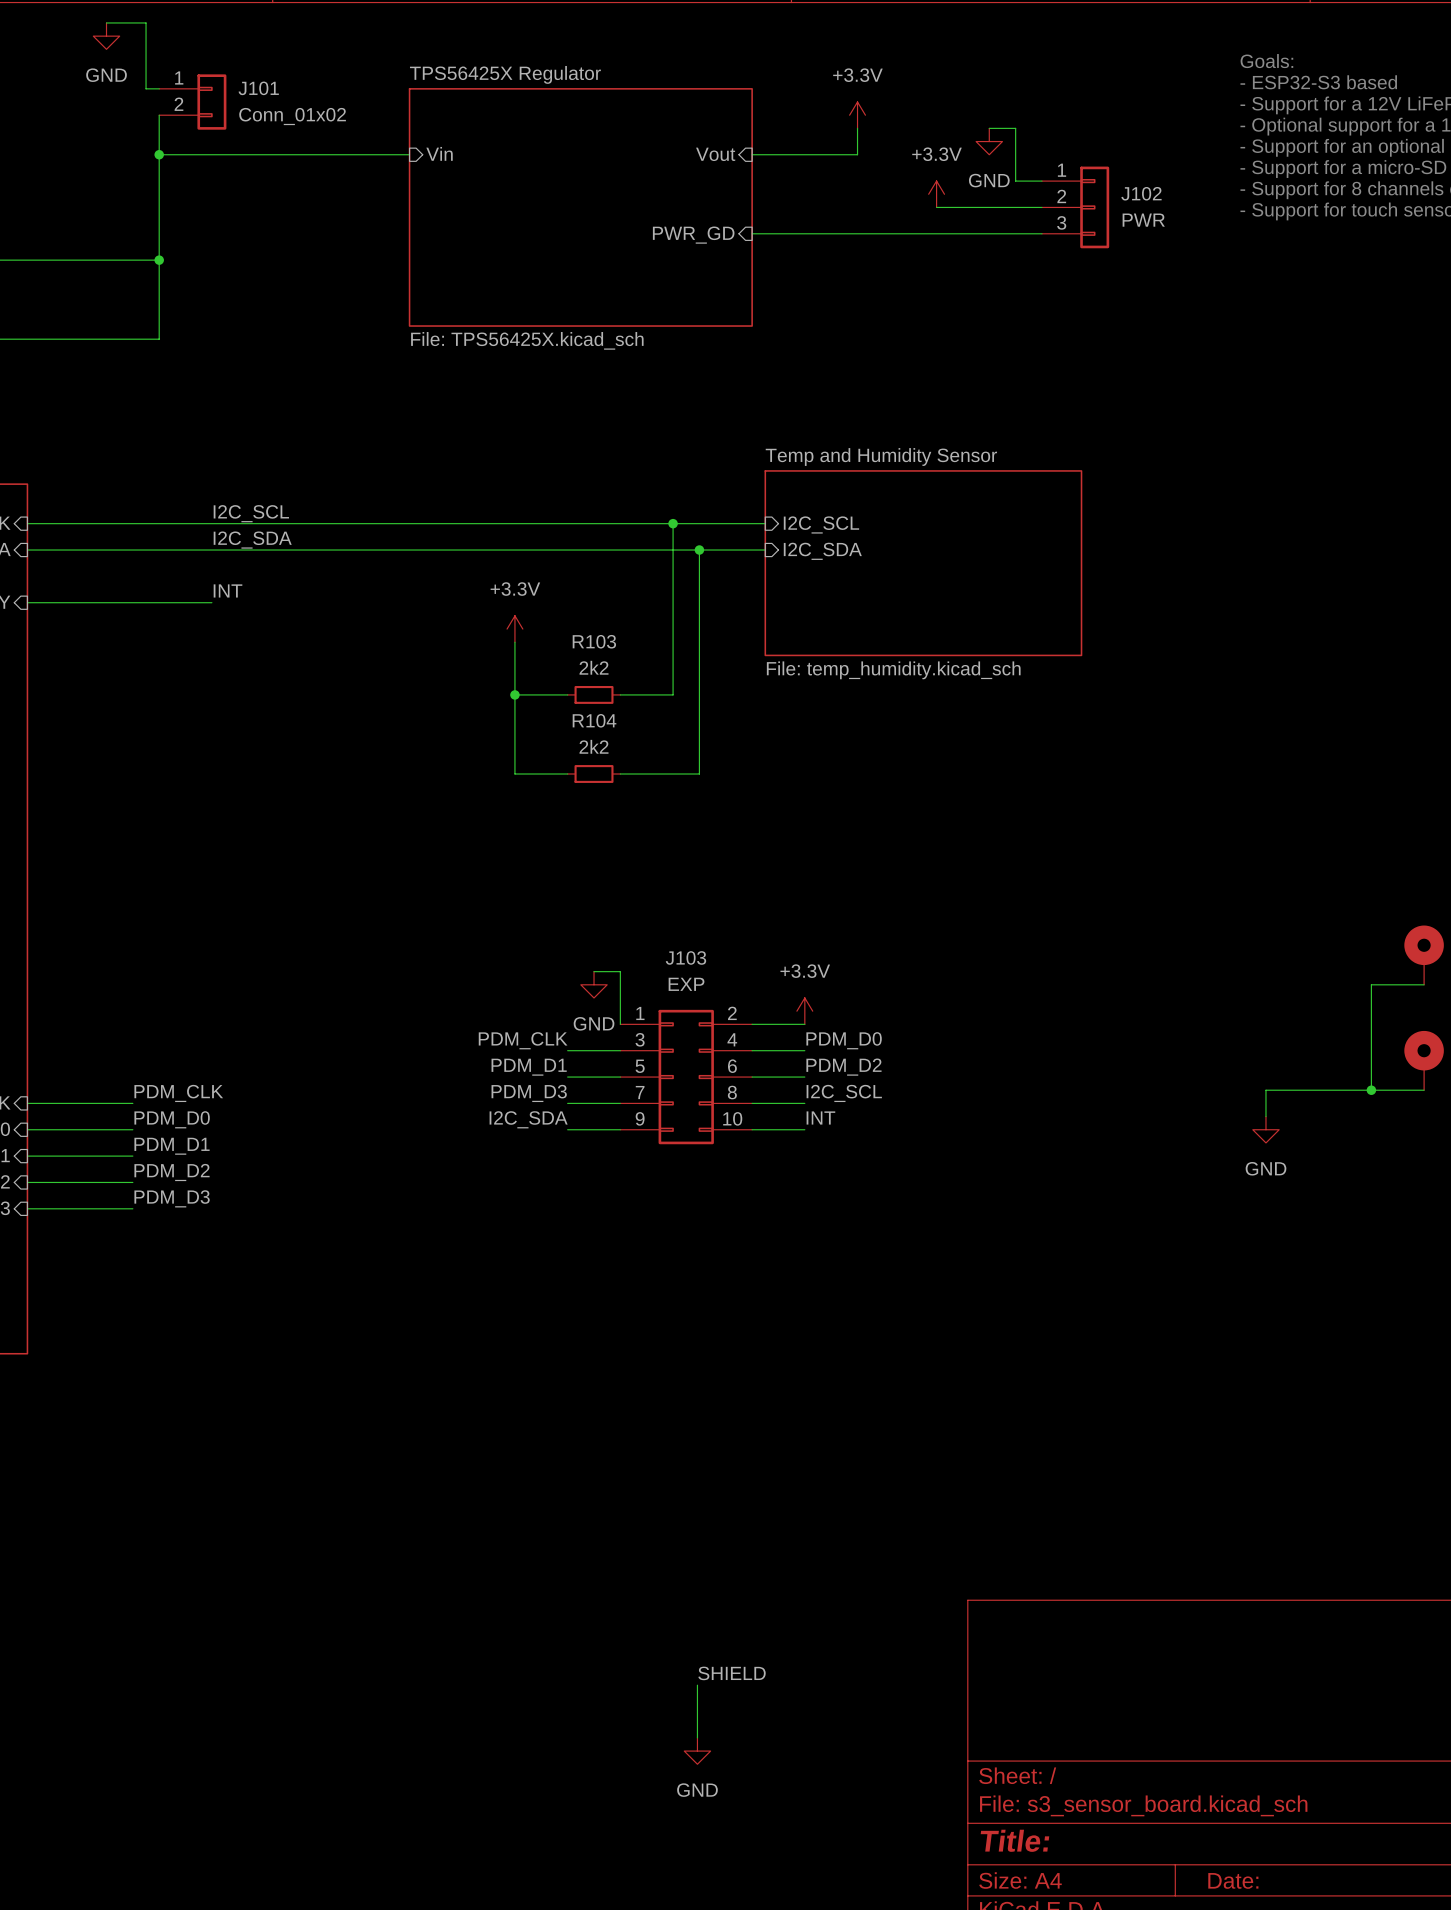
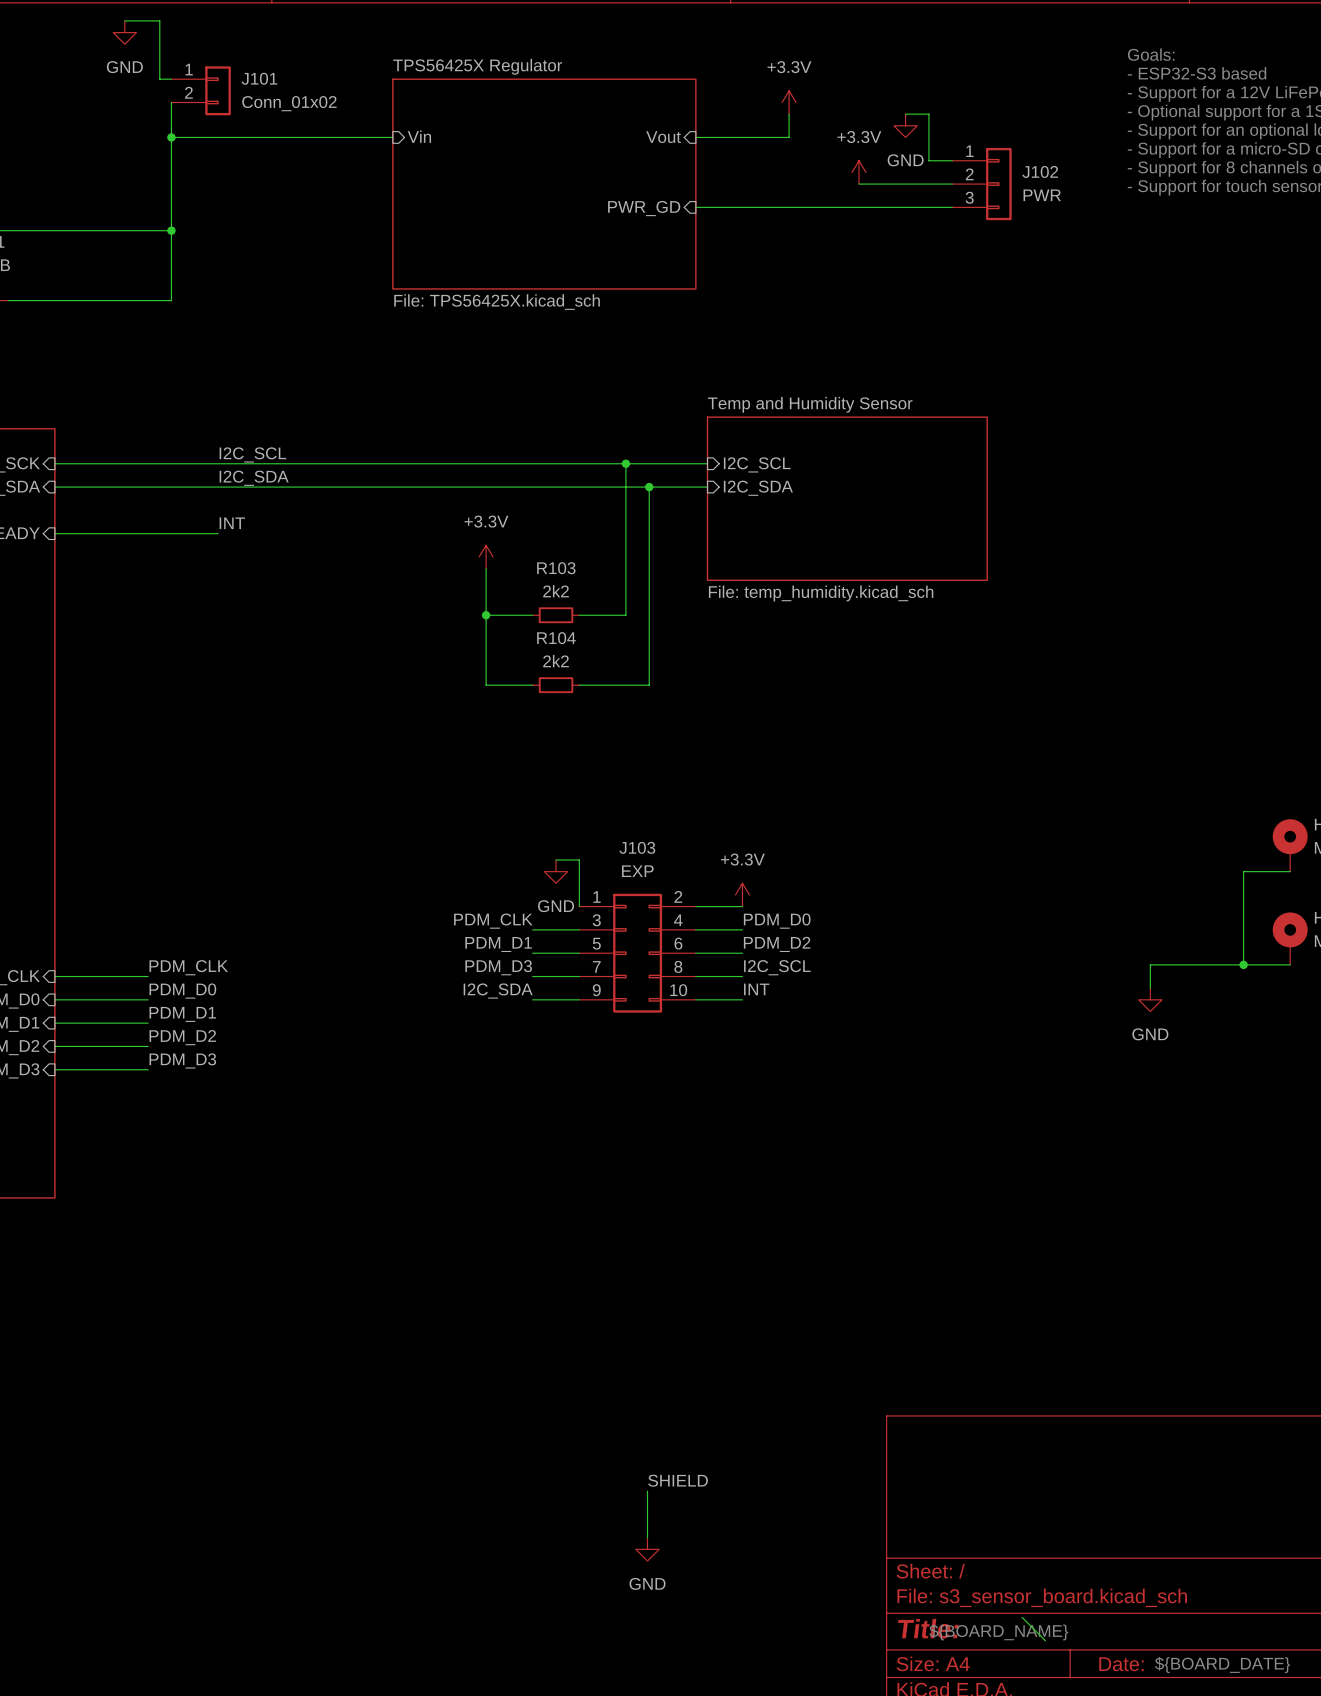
wire: none -> (1022, 1617) (1045, 1640)
text: none -> ${BOARD_NAME} (998, 1632)
text: none -> ${BOARD_DATE} (1222, 1665)

